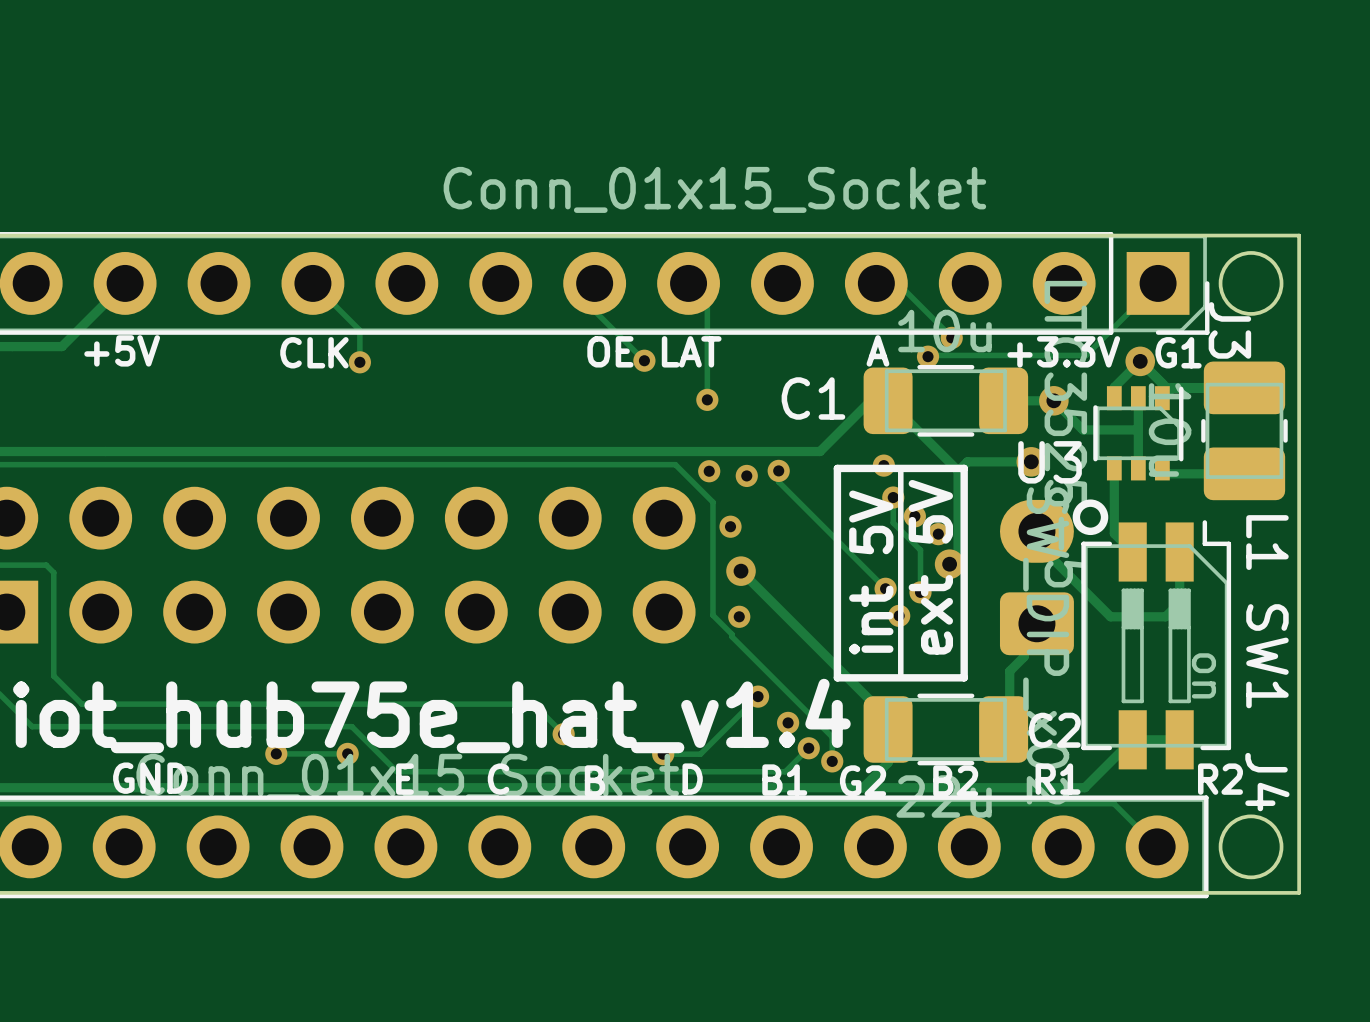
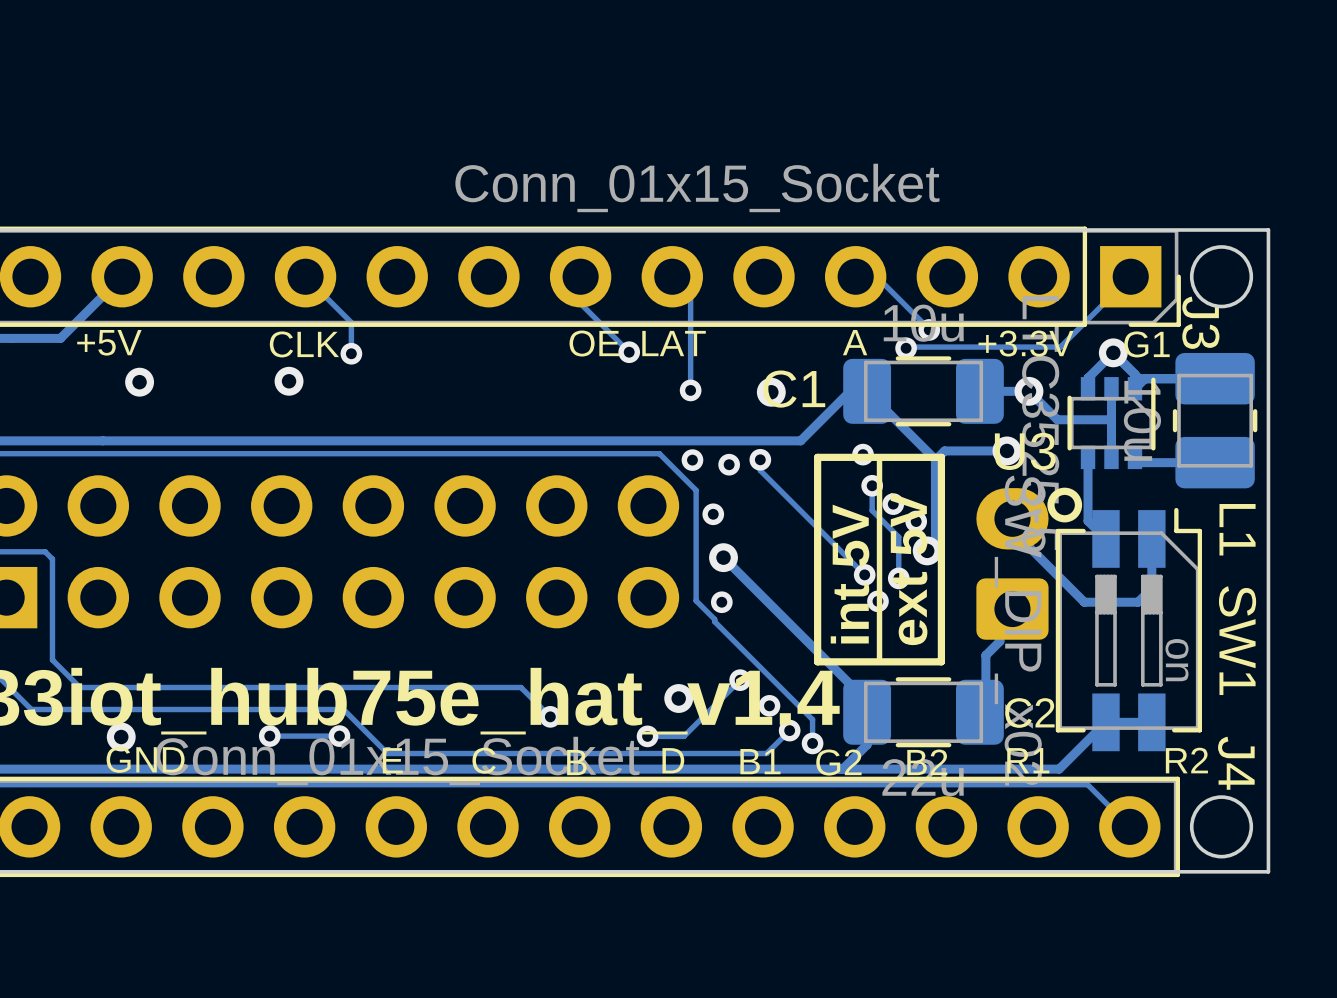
via: none -> (289, 381)
via: none -> (139, 382)
via: none -> (771, 392)
via: none -> (678, 698)
via: none -> (121, 737)

